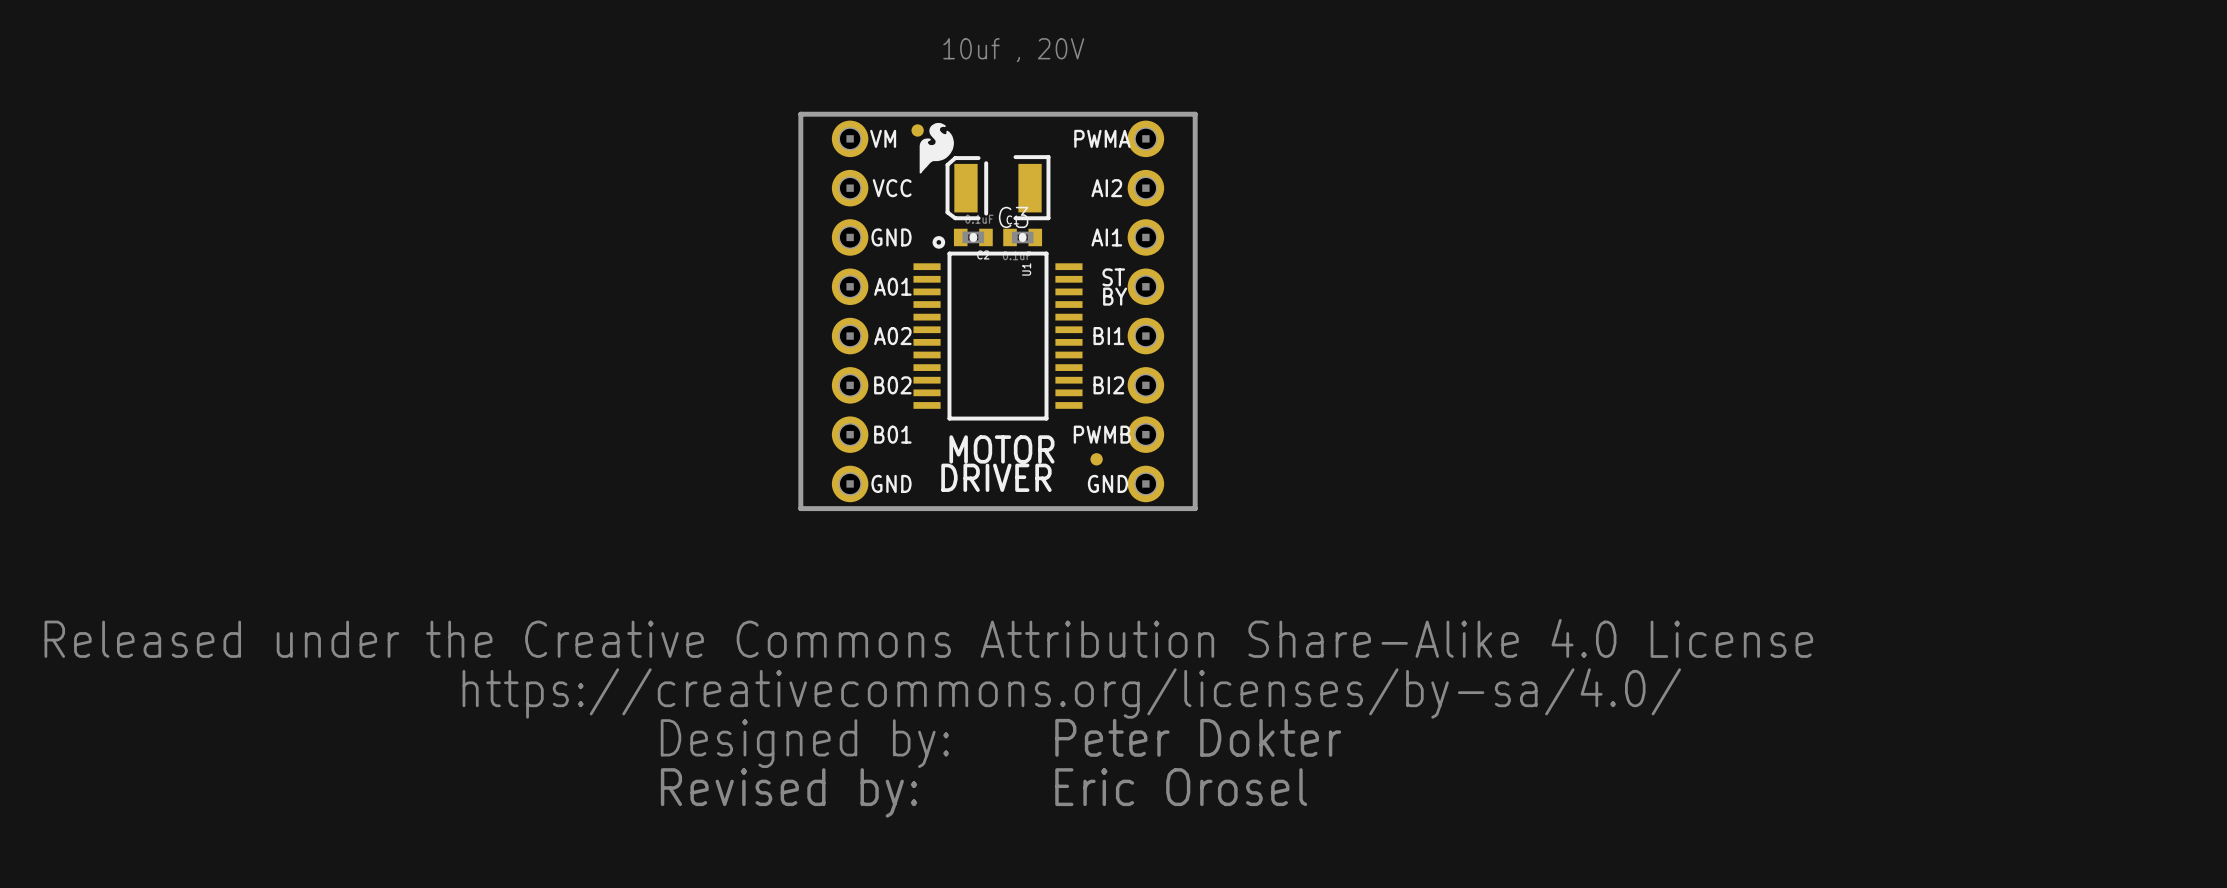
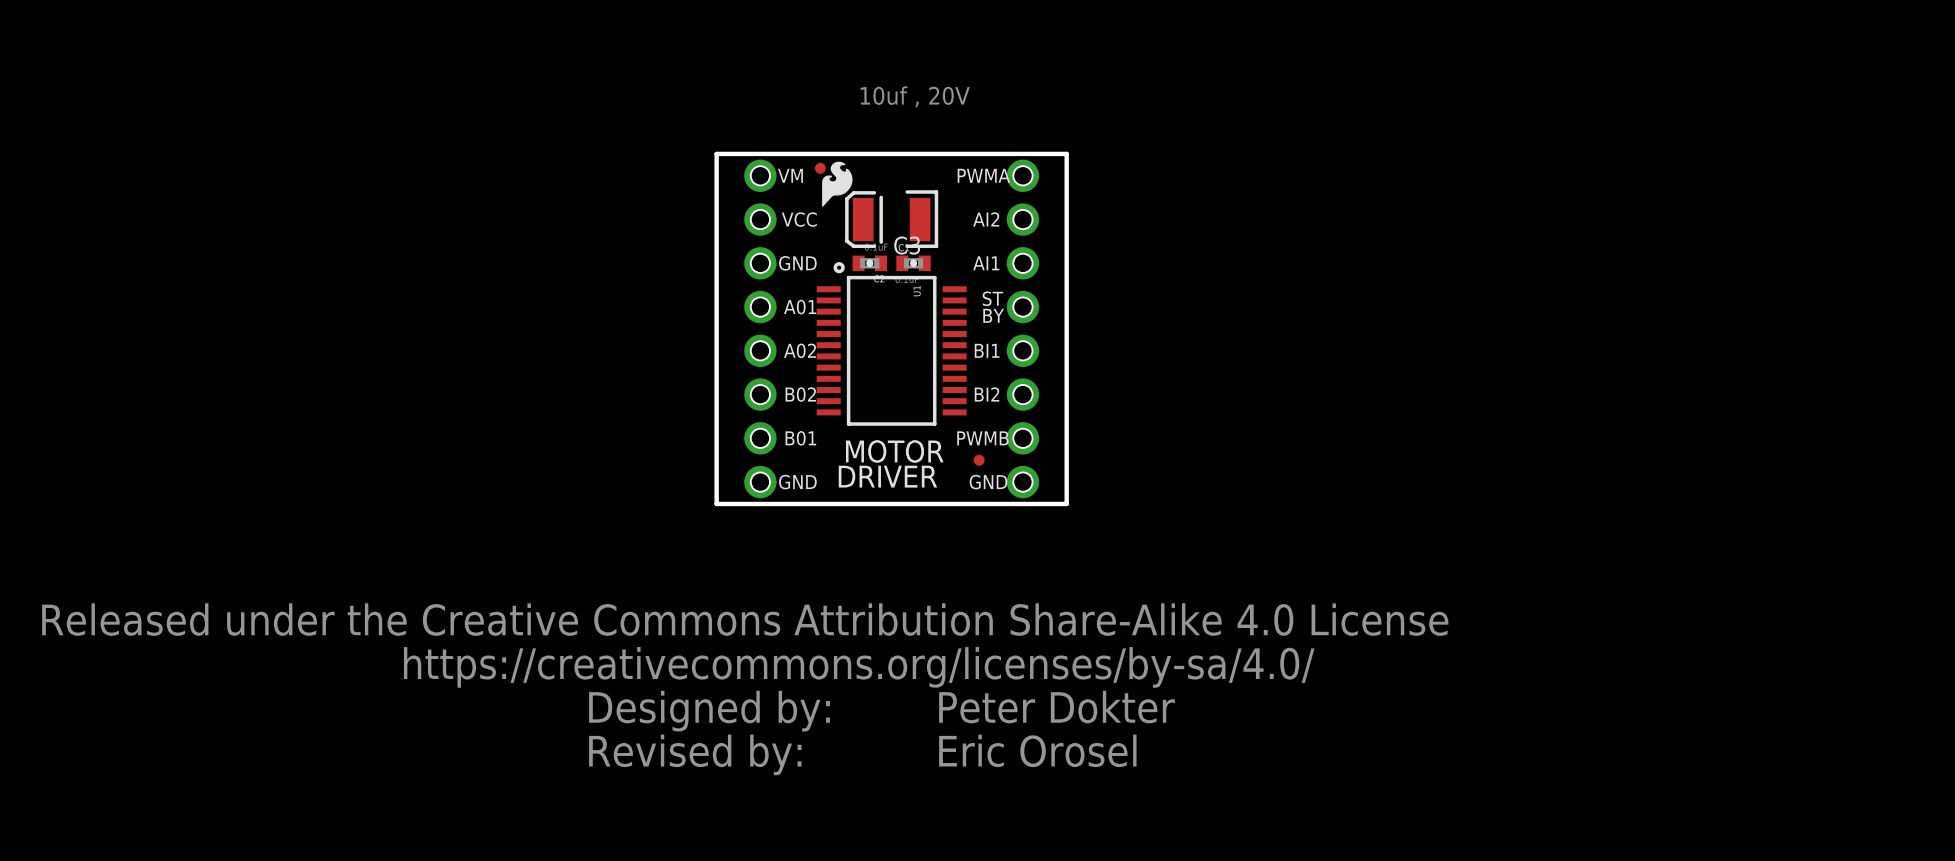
part footprint: [831, 120, 869, 503] -> [744, 159, 777, 499]
part footprint: [1127, 120, 1165, 503] -> [1006, 159, 1040, 499]

